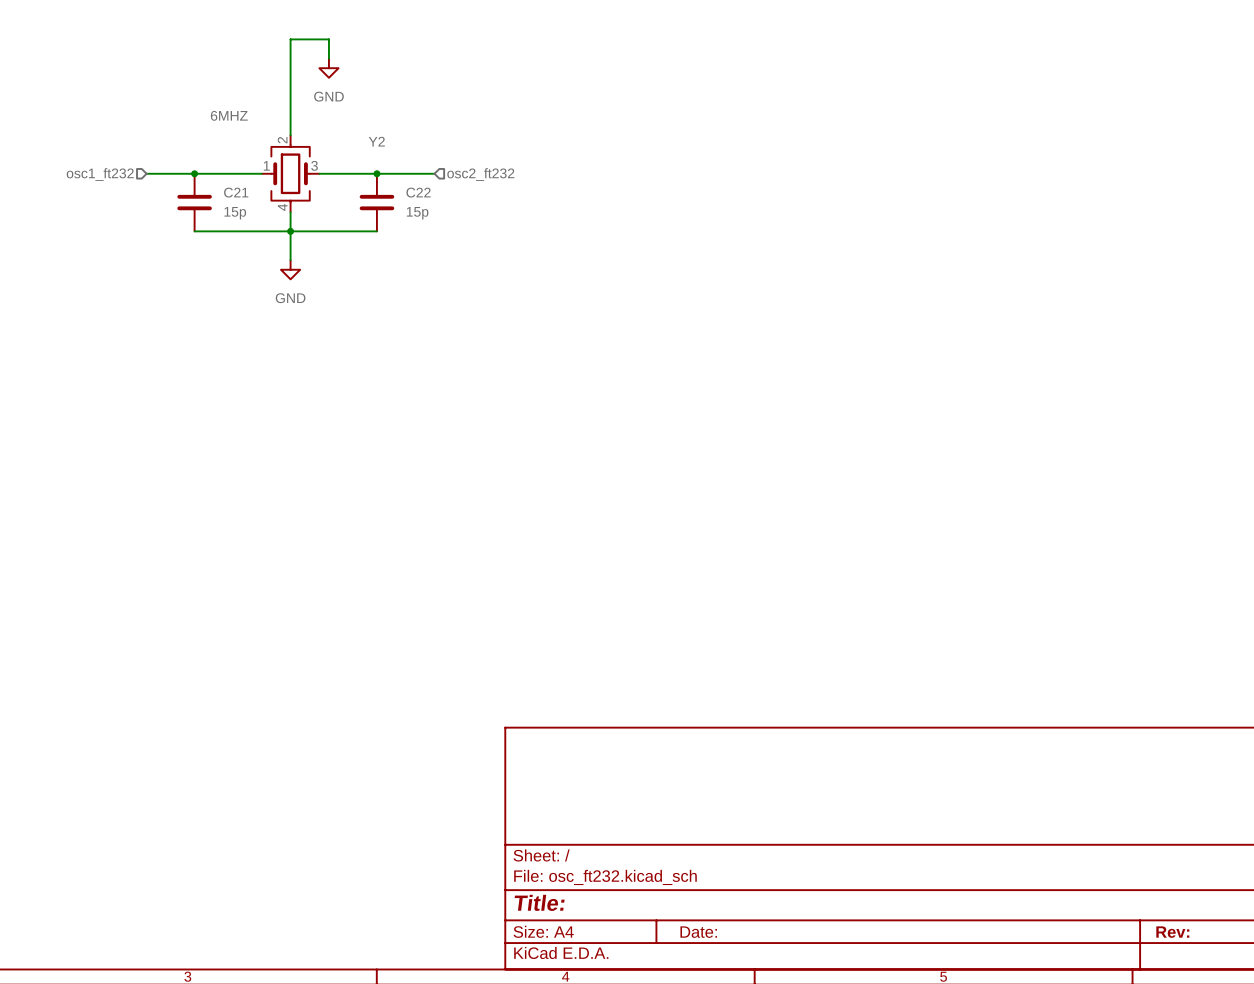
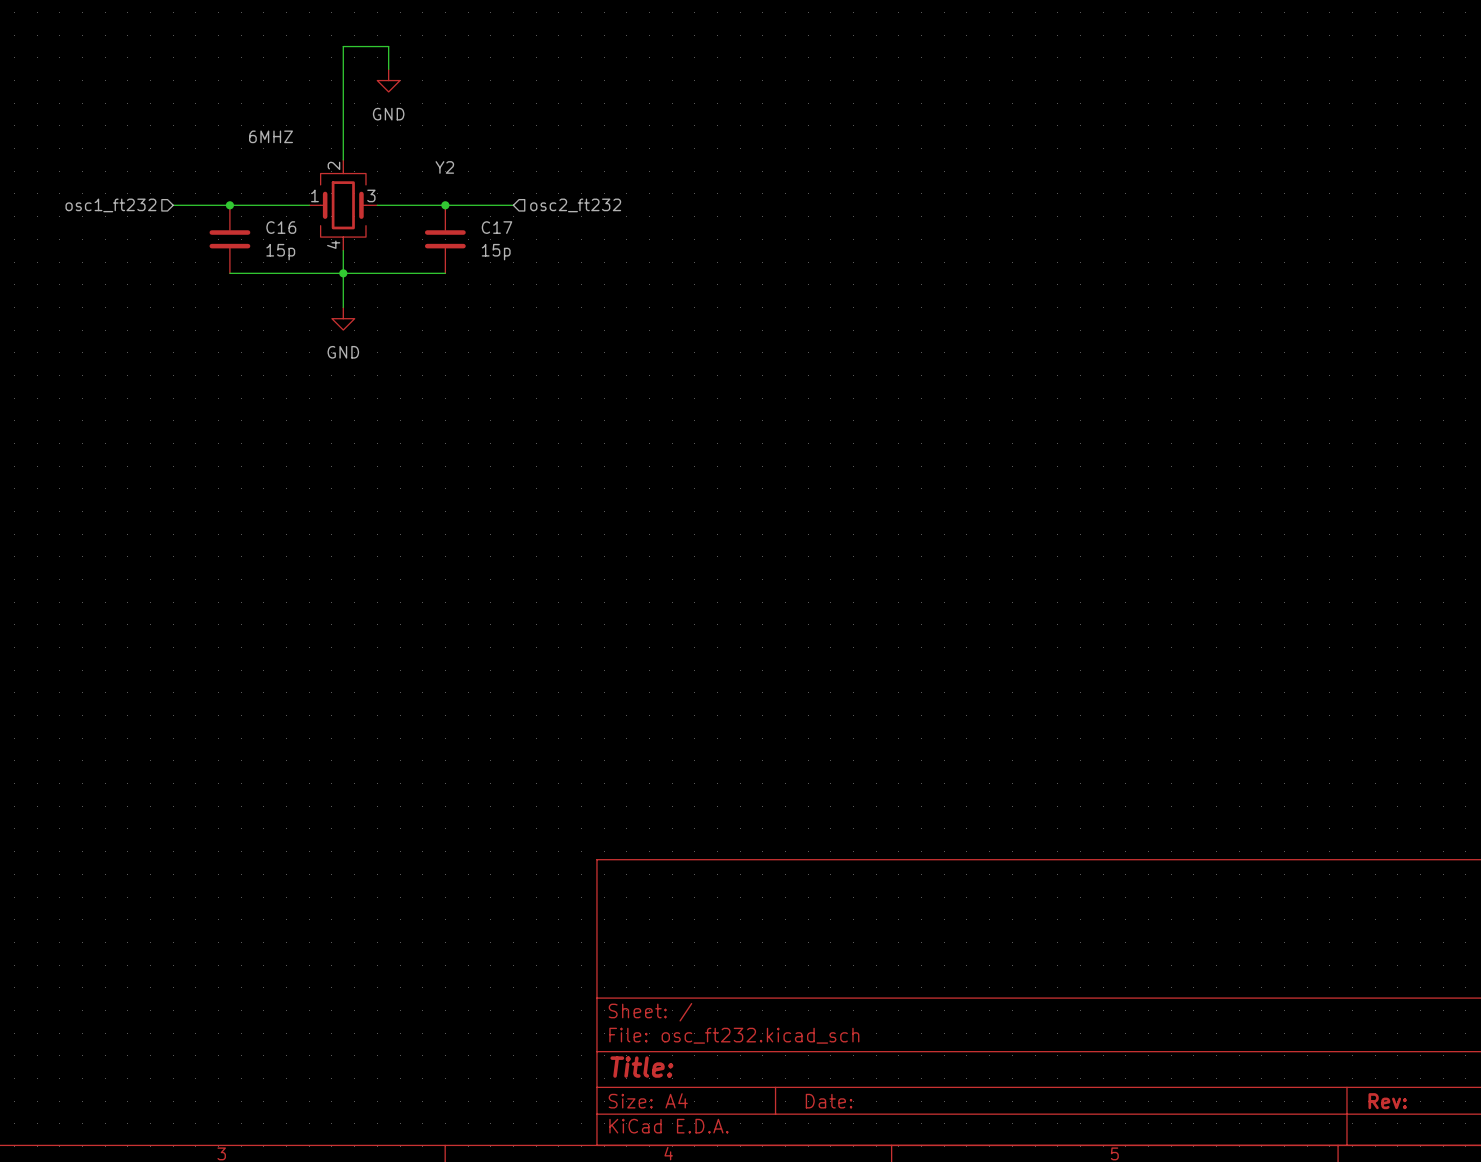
C21 name: C21 (236, 192) -> C16 (281, 227)
C22 name: C22 (418, 192) -> C17 (497, 227)

